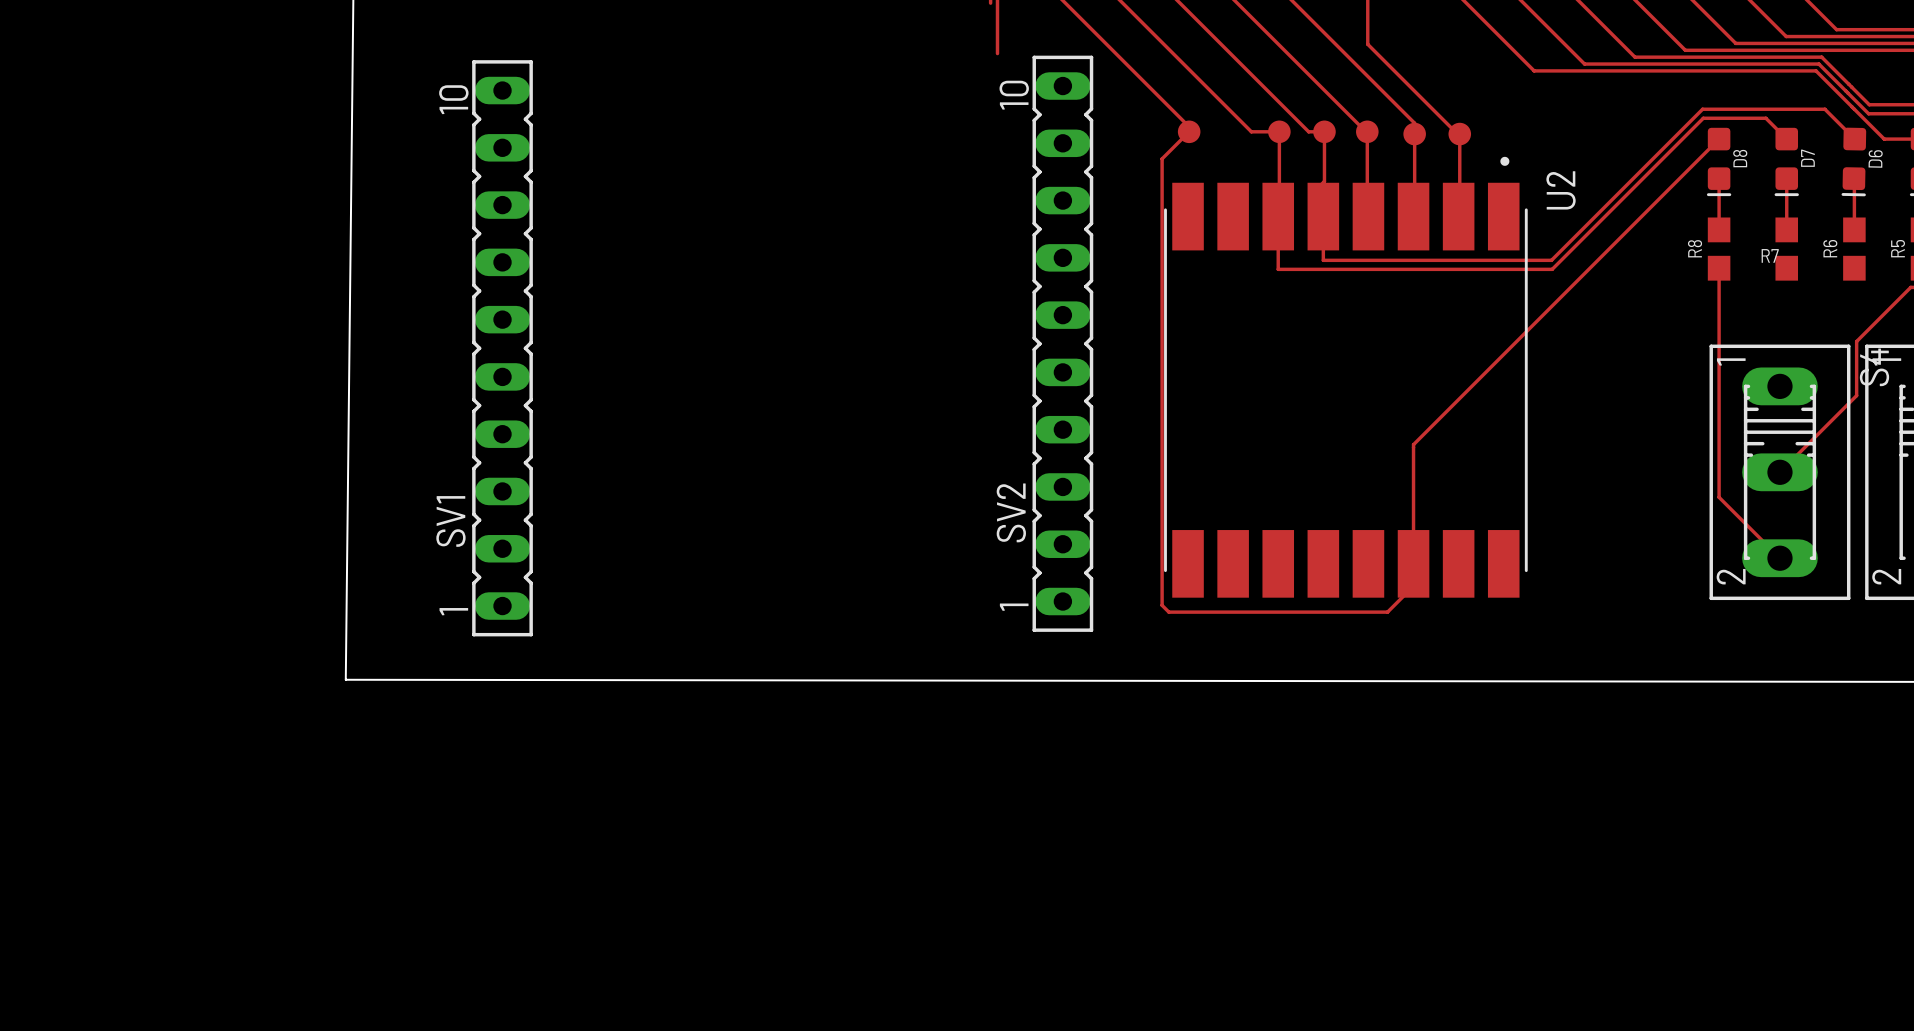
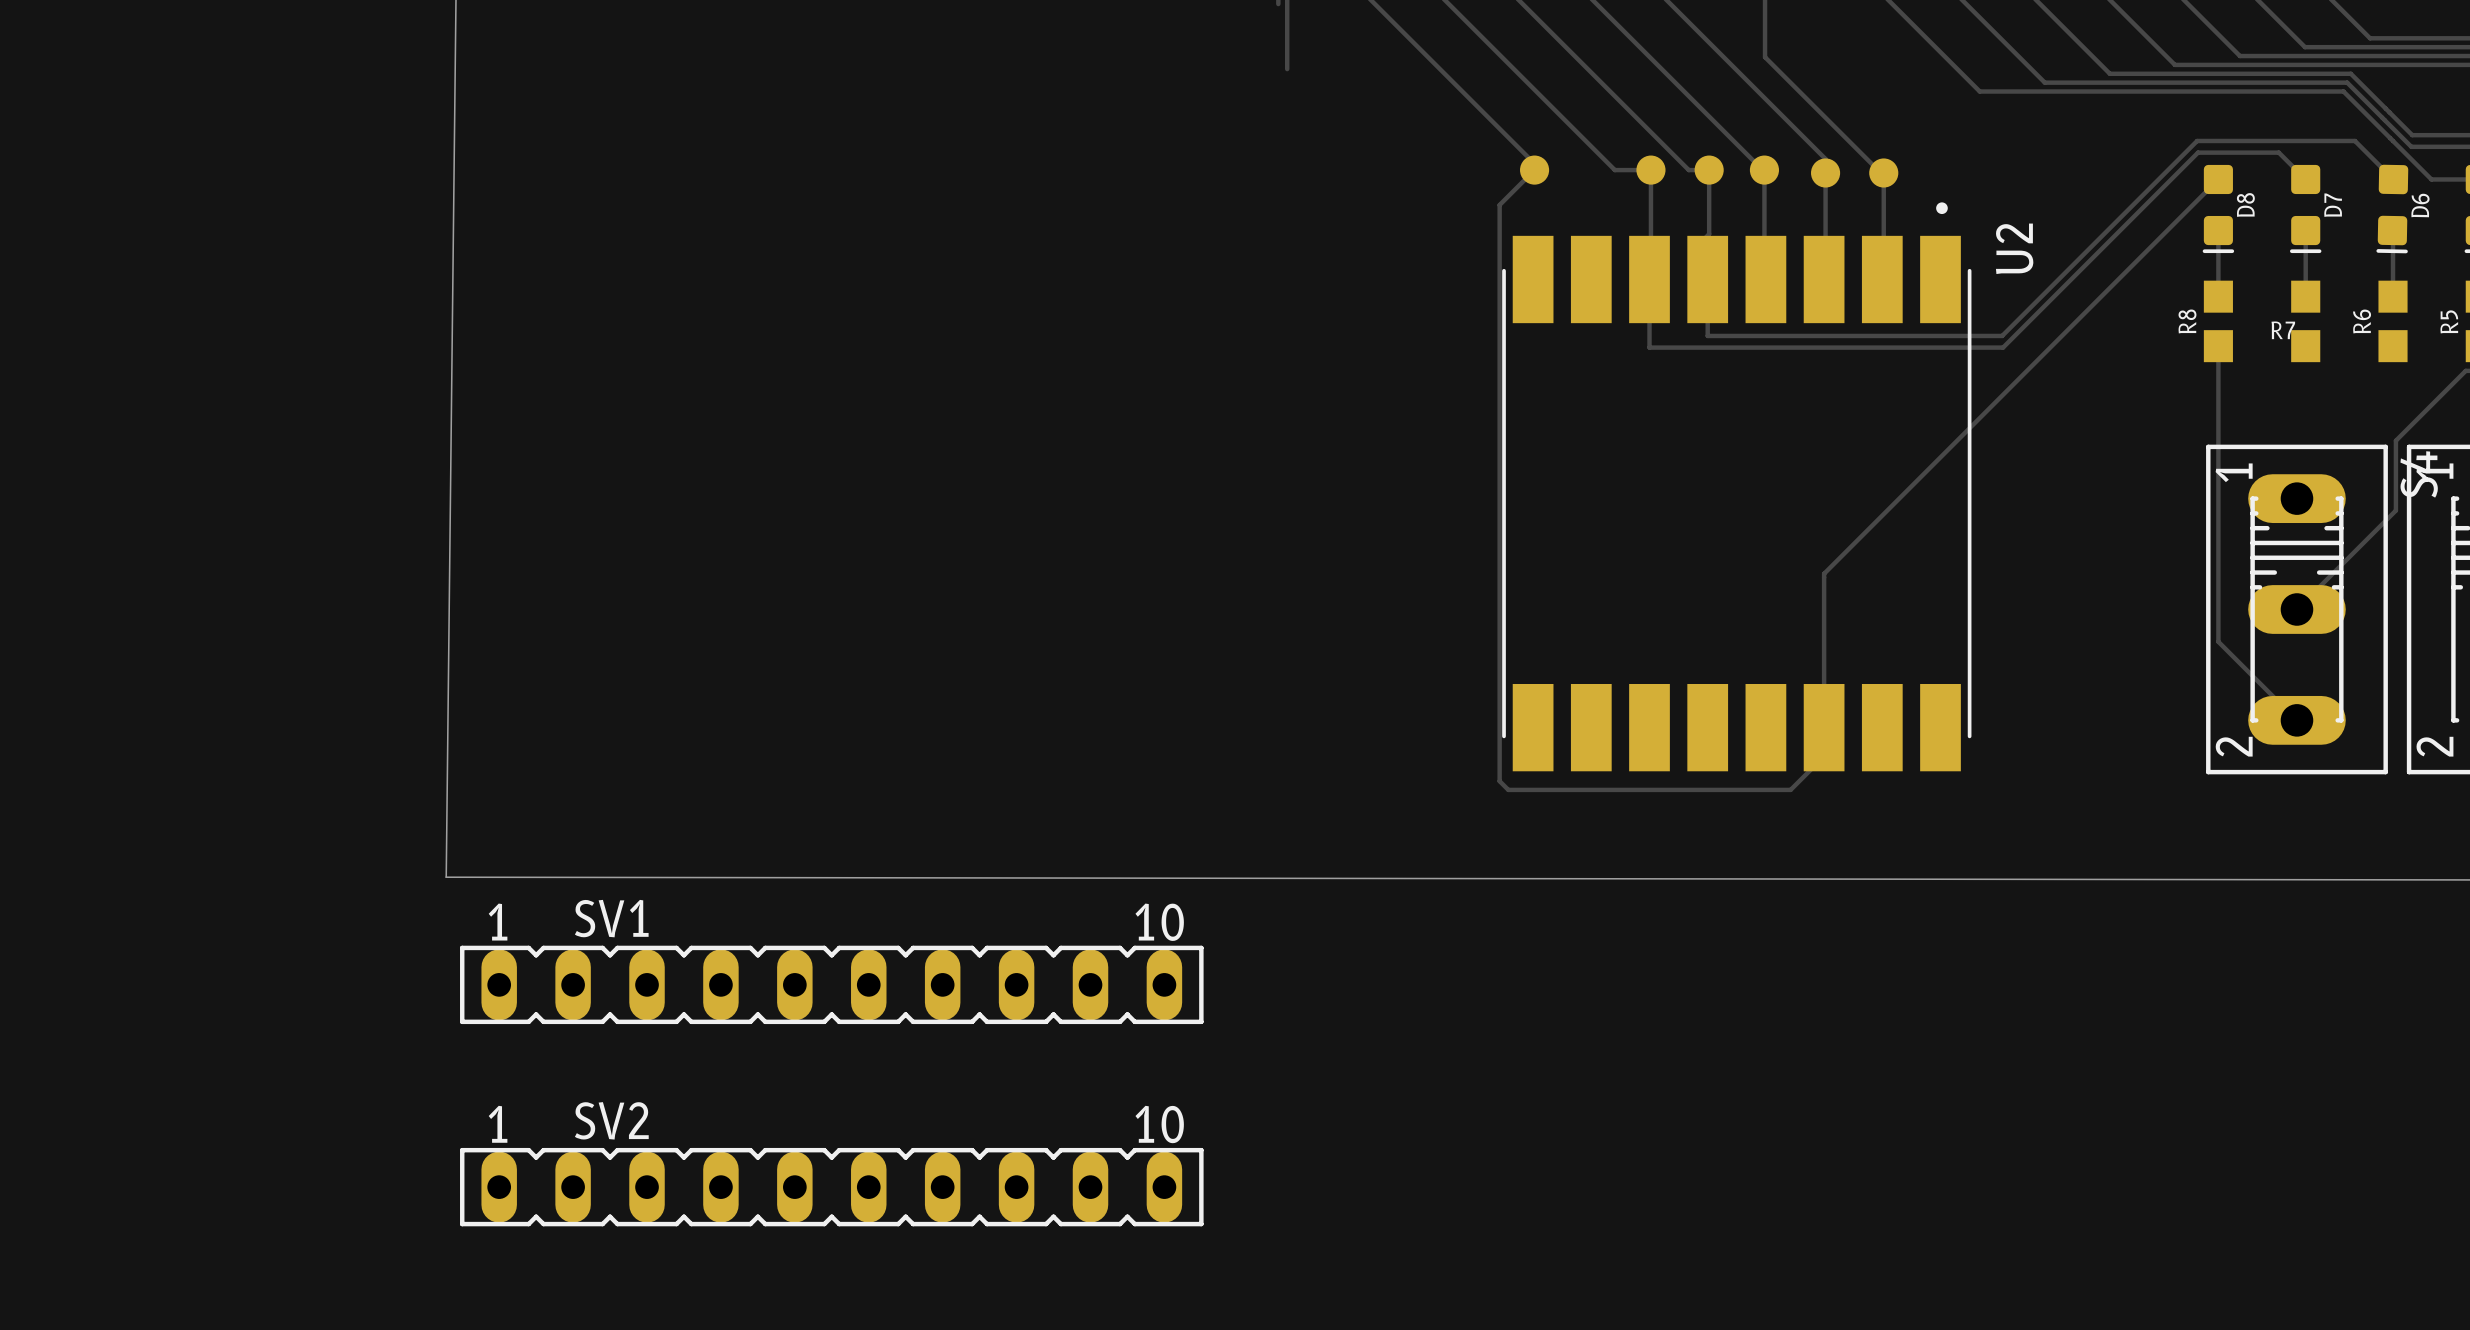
SV2 rotation: 0° (1062, 343) -> 90° clockwise (831, 1187)
SV2 position: (1062, 343) -> (831, 1187)
SV1 rotation: 0° (502, 348) -> 90° clockwise (831, 984)
SV1 position: (502, 348) -> (831, 984)

